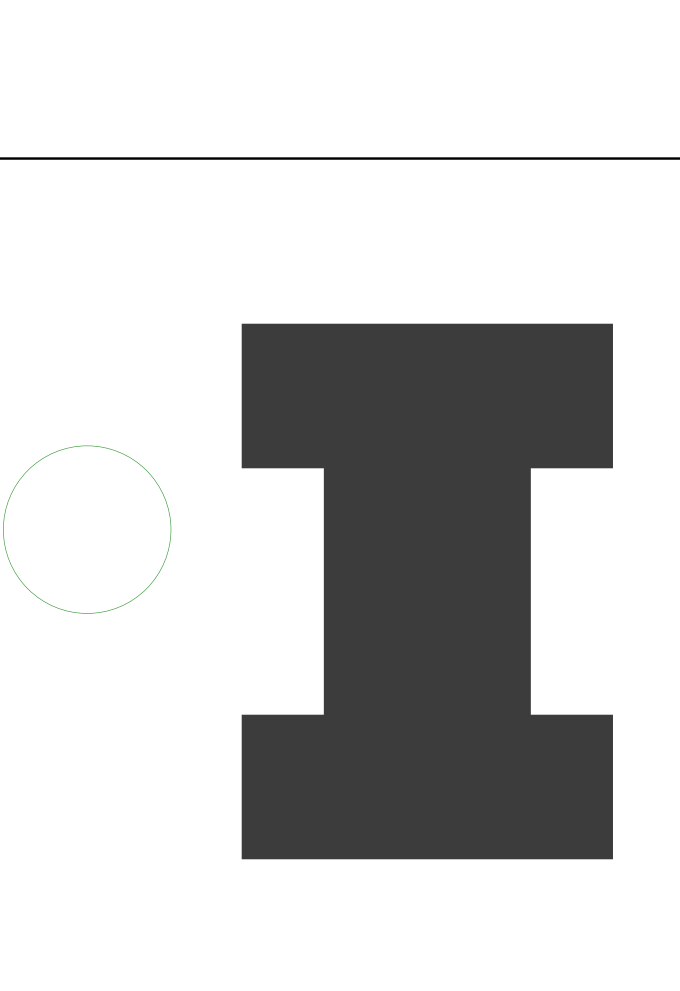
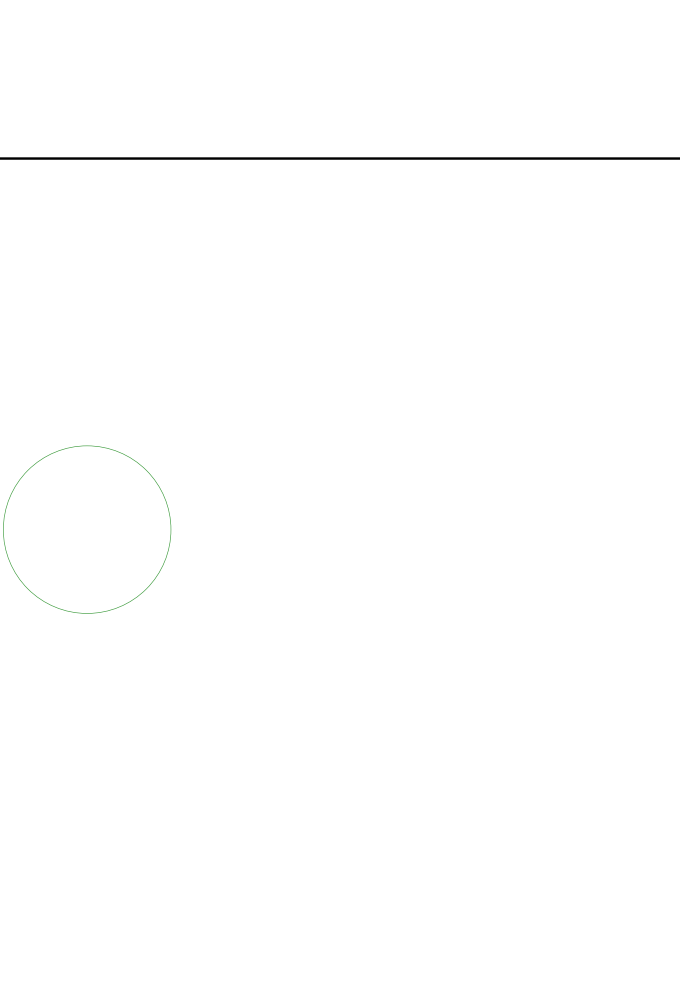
drawing: [241, 323, 613, 860] -> none

